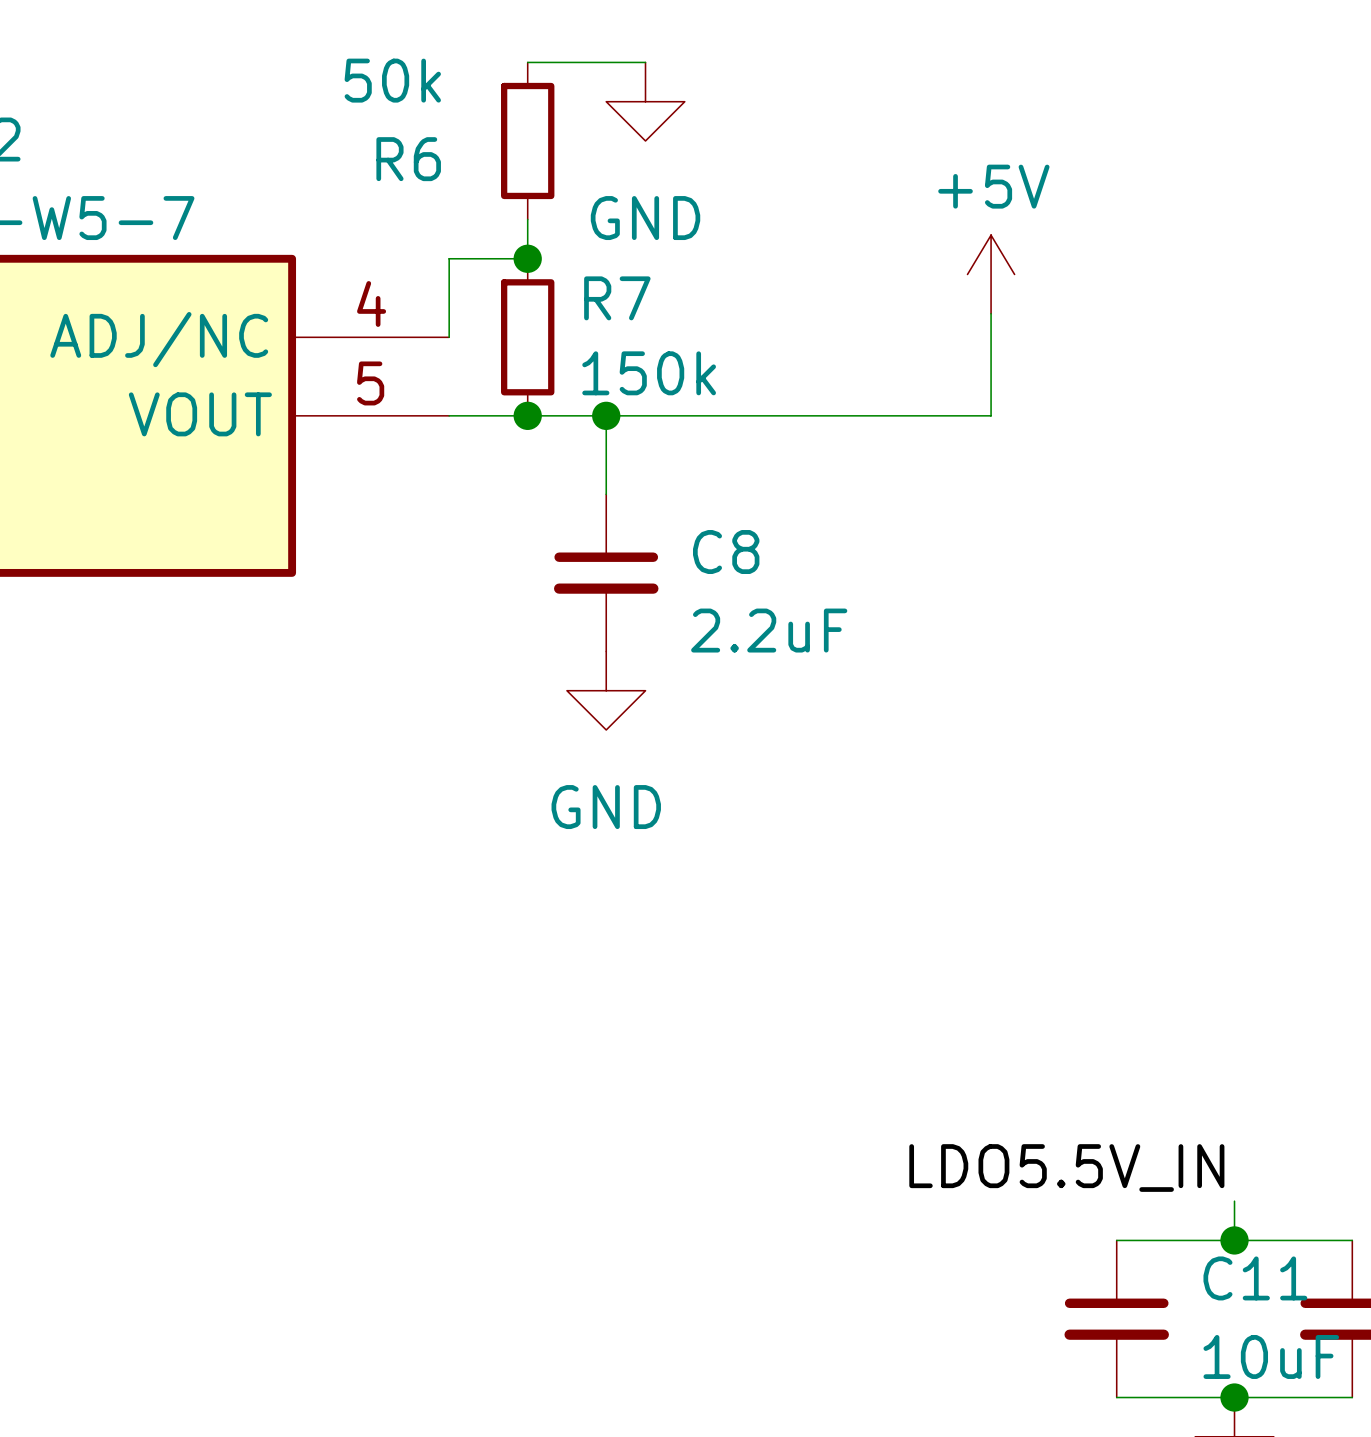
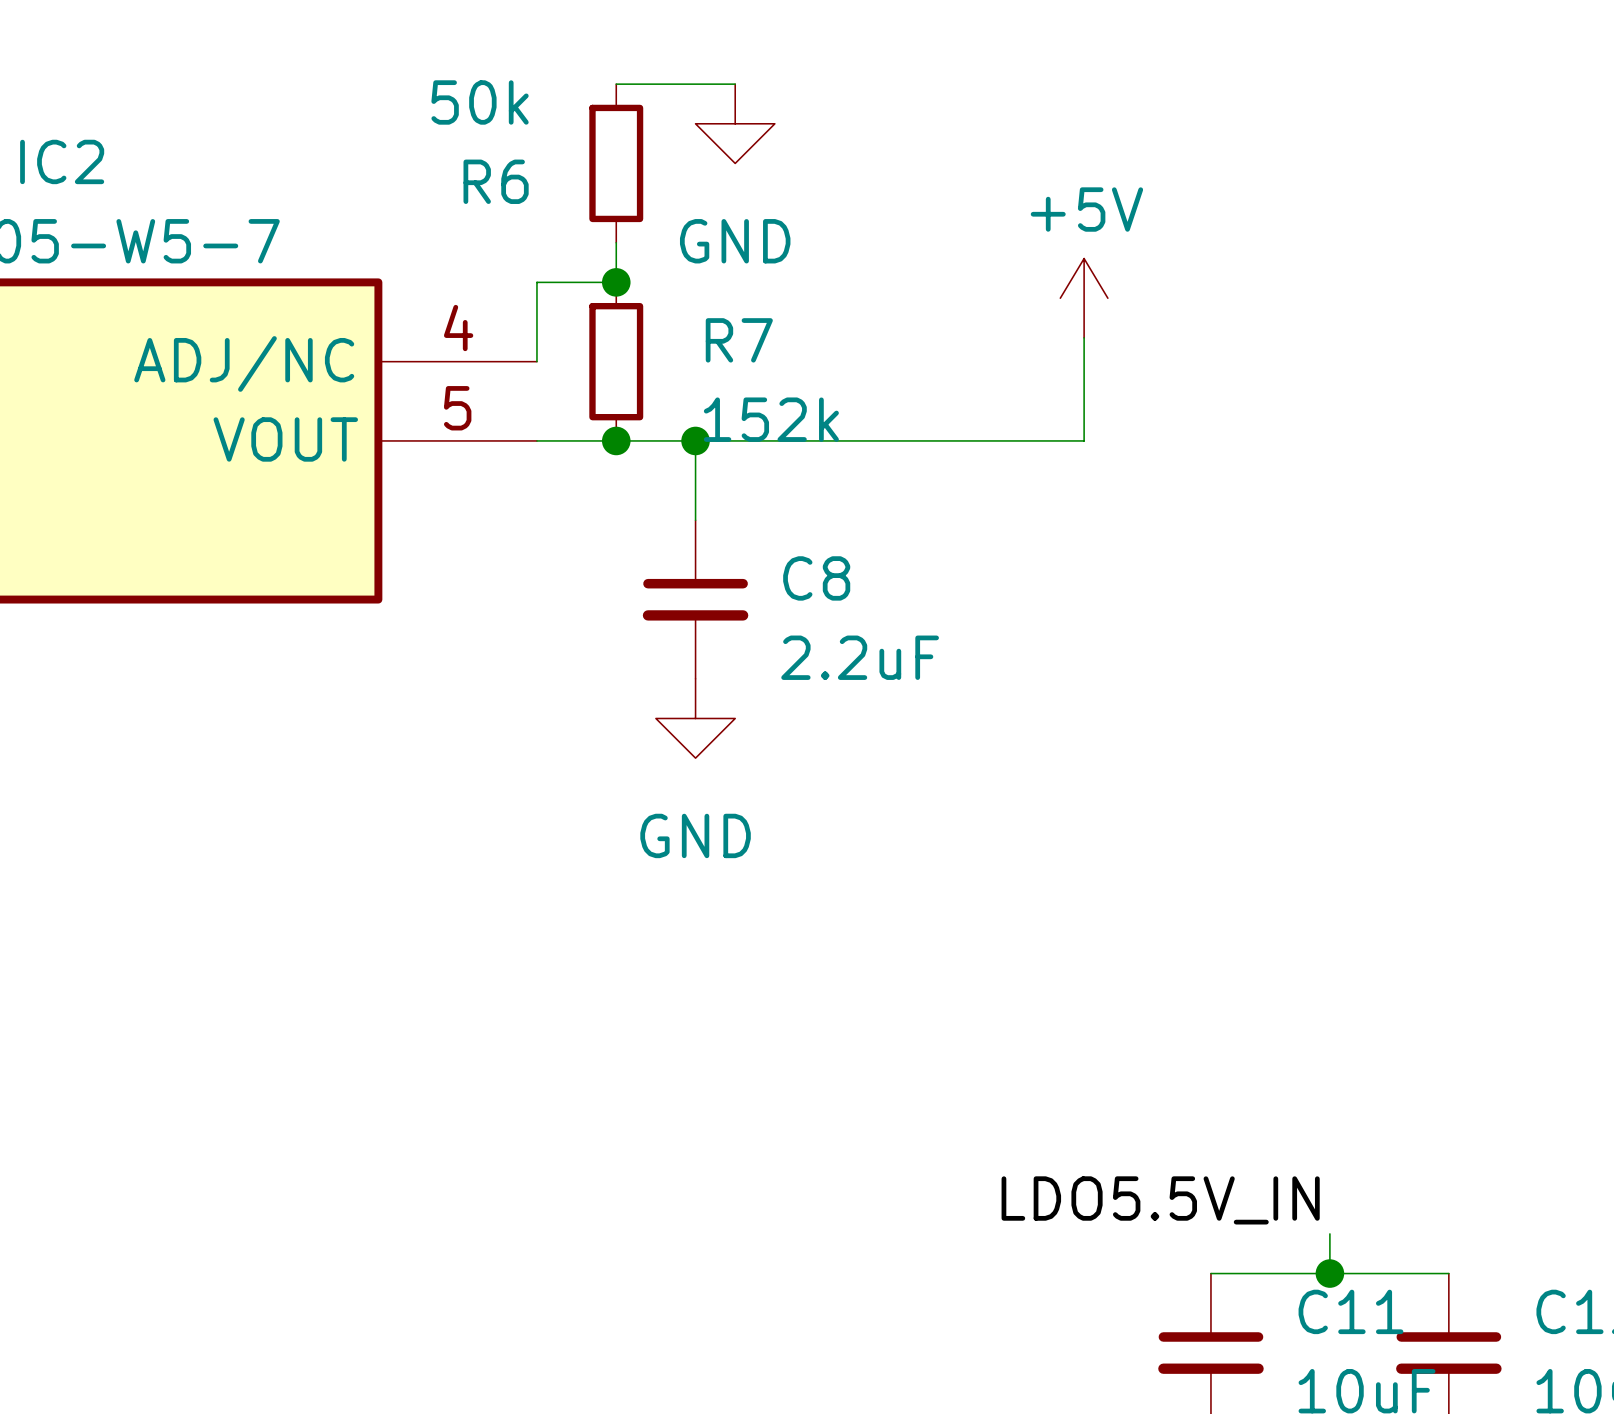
R7 name position: R7 (617, 298) -> R7 (739, 340)
R7 value: 150k (649, 373) -> 152k (771, 419)

